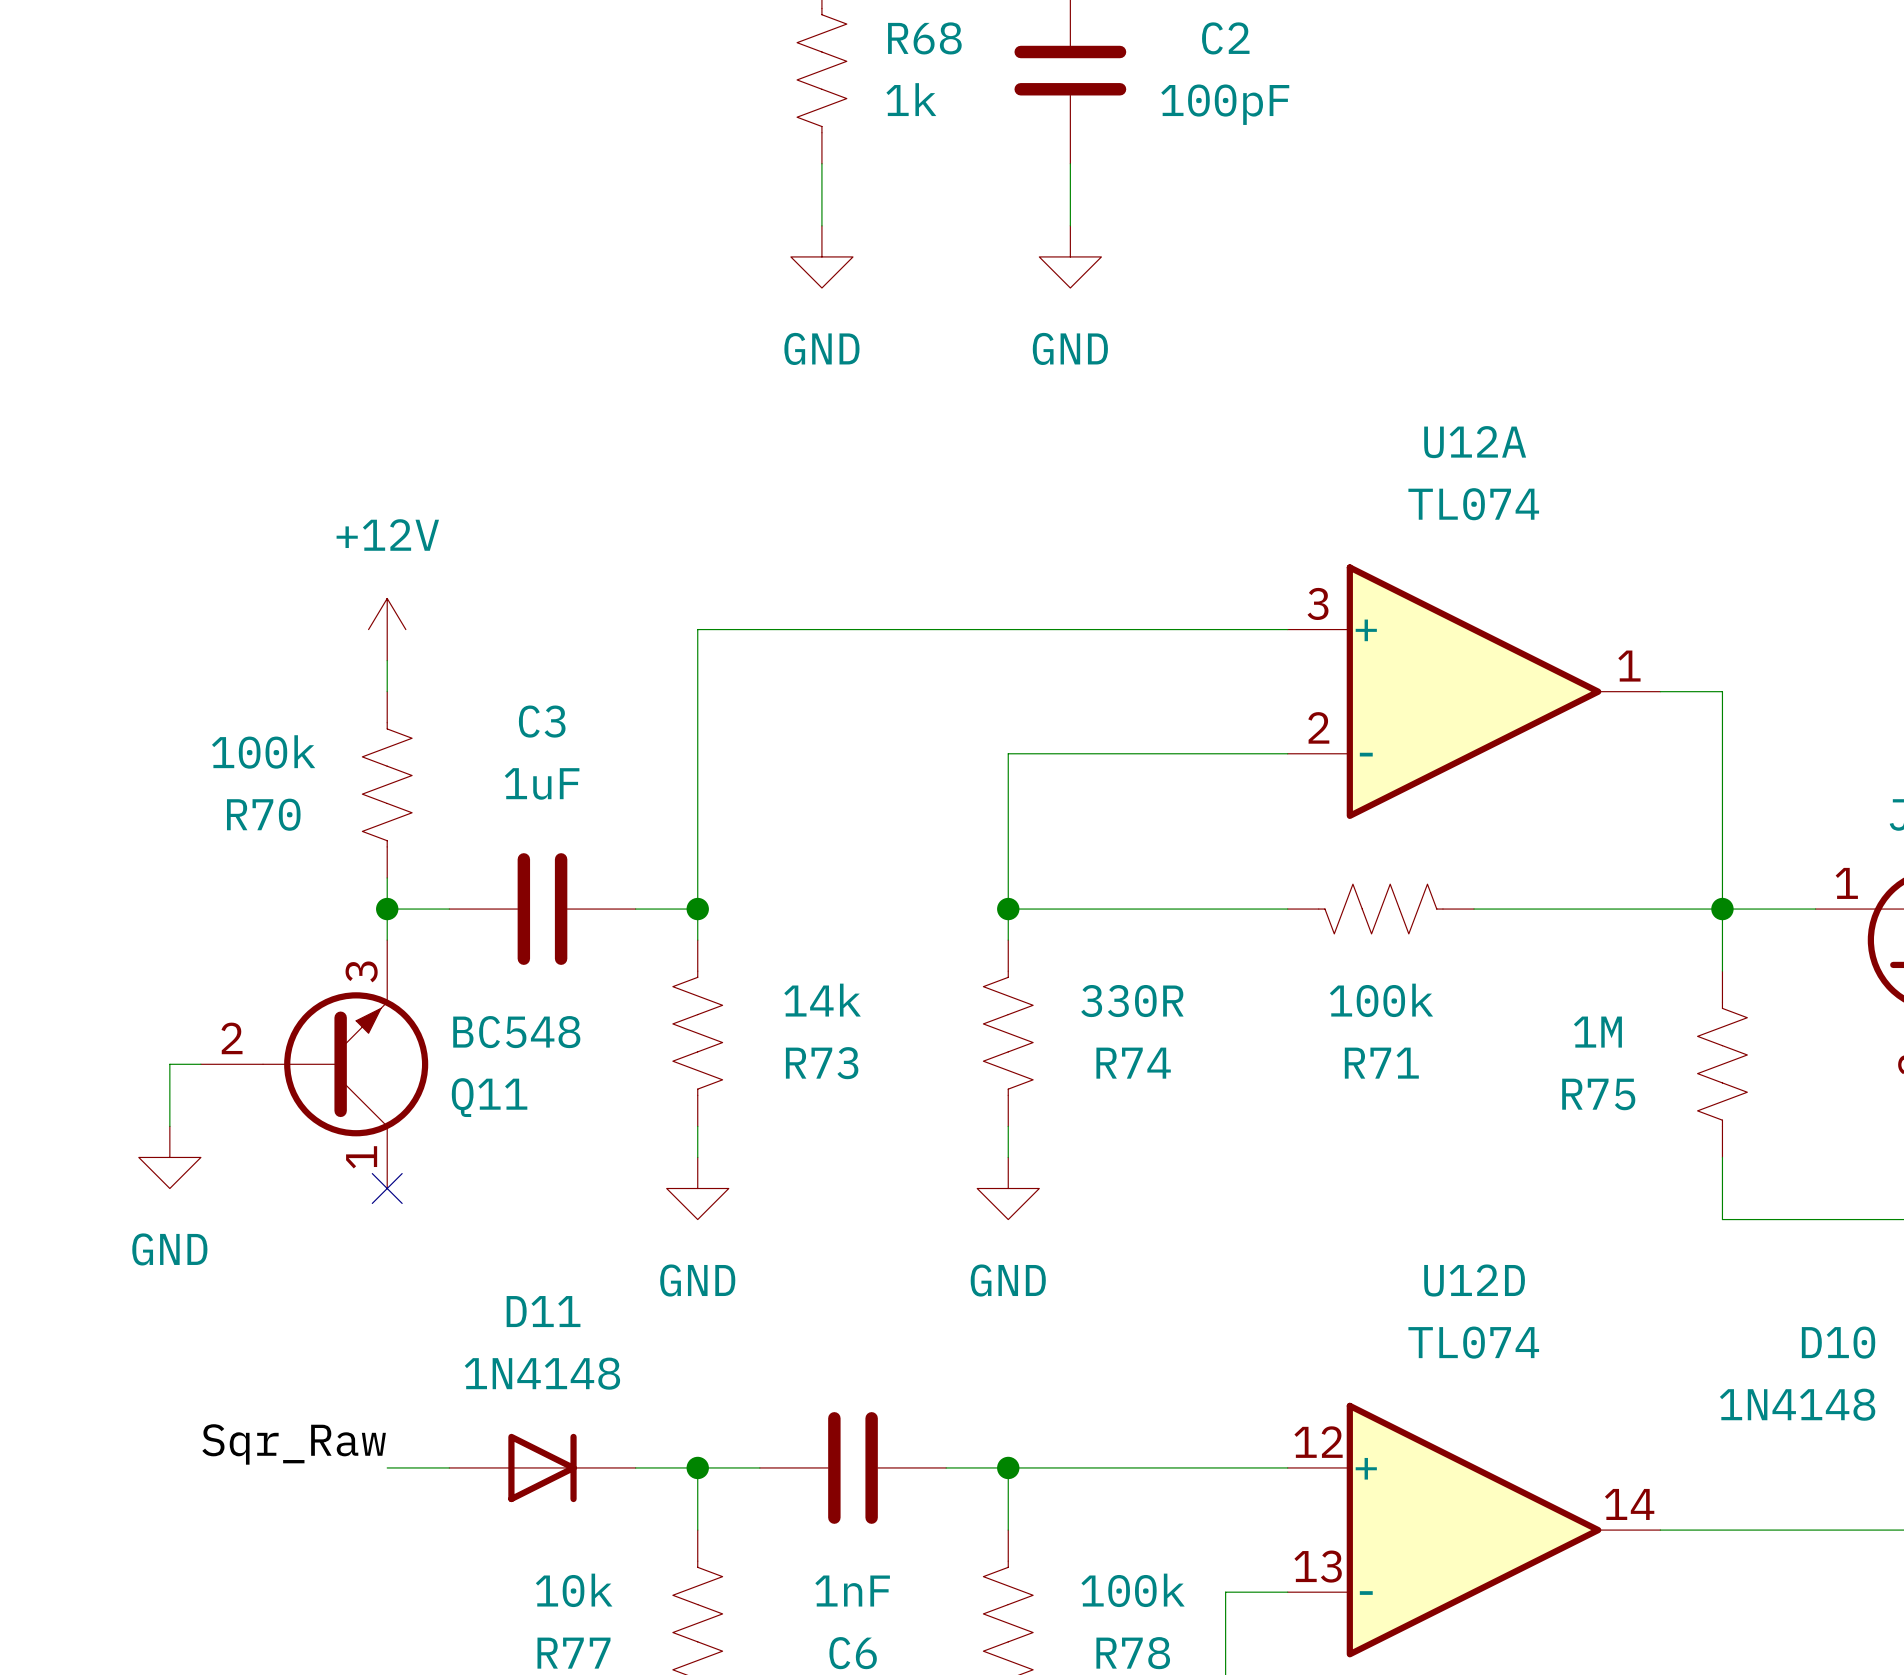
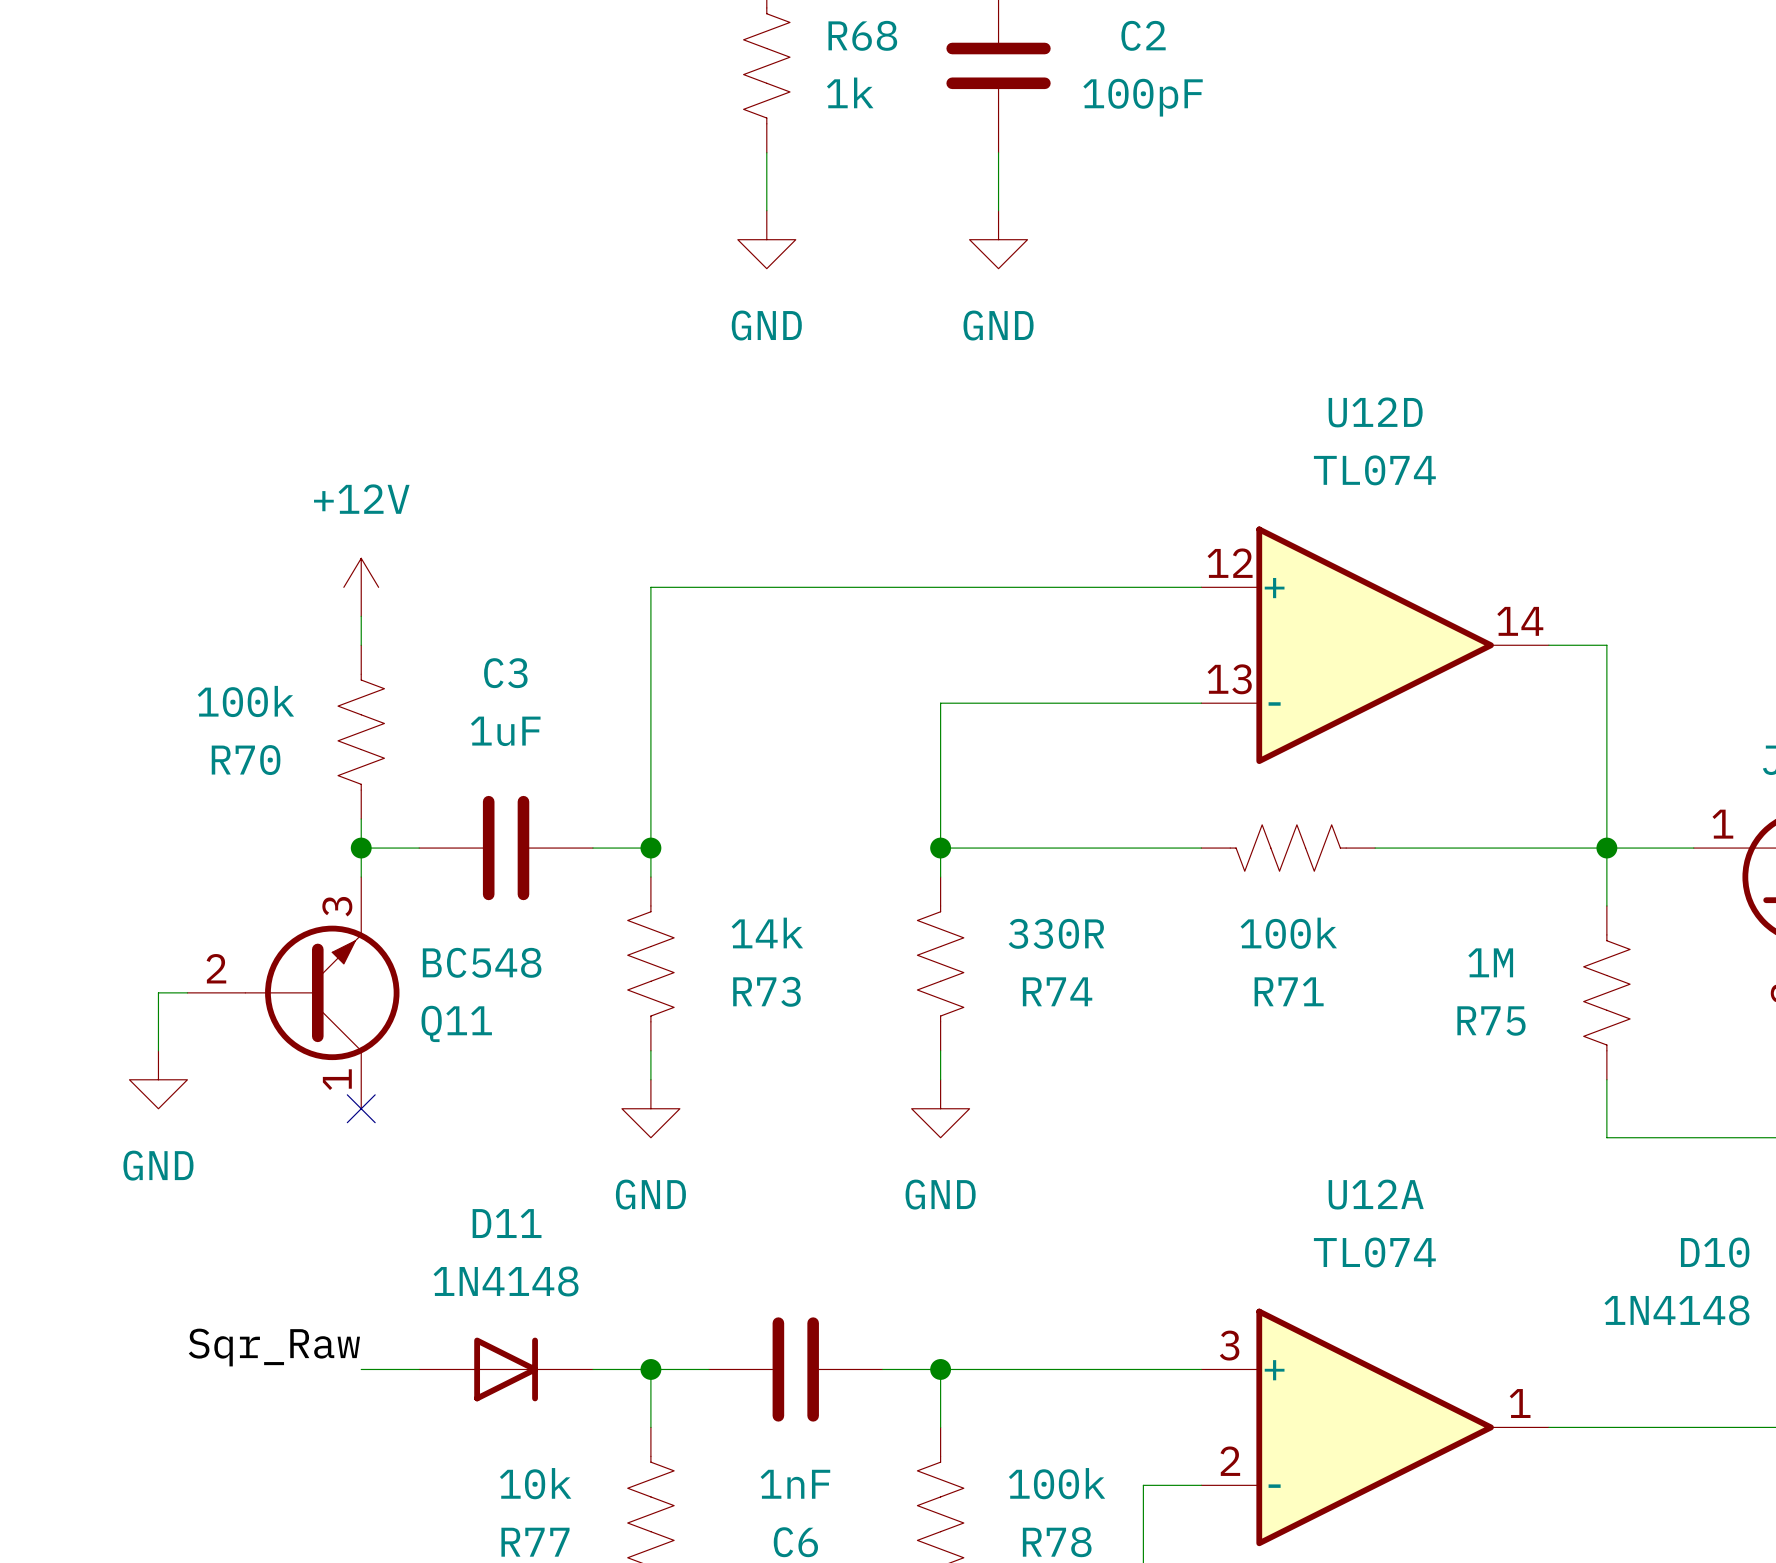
U12A position: (1474, 691) -> (1375, 1427)
U12D position: (1474, 1530) -> (1375, 645)

